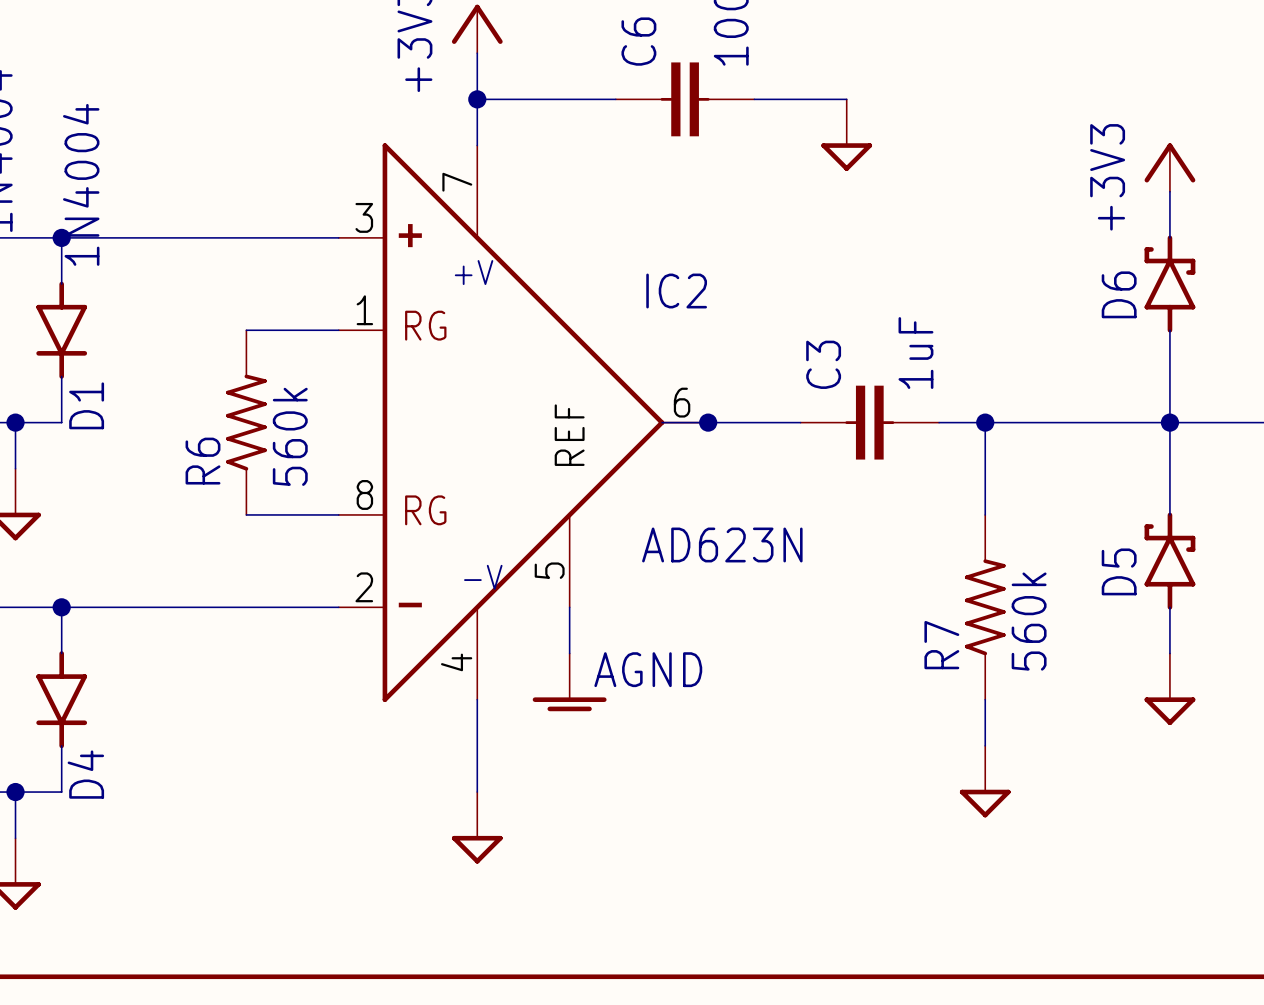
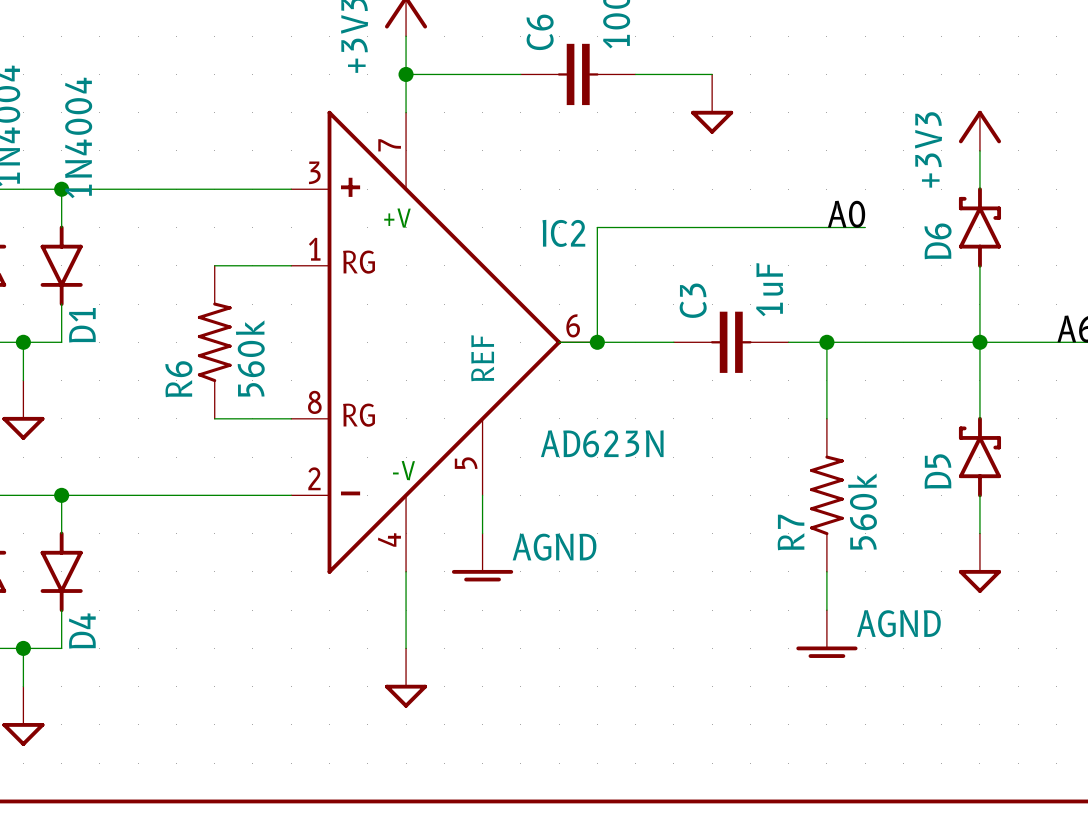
label: none -> A0 (846, 214)
wire: none -> (865, 227) (597, 227) (597, 342)
power symbol shape: [959, 745, 1011, 818] -> [796, 610, 858, 658]
power symbol text: none -> AGND (898, 623)

